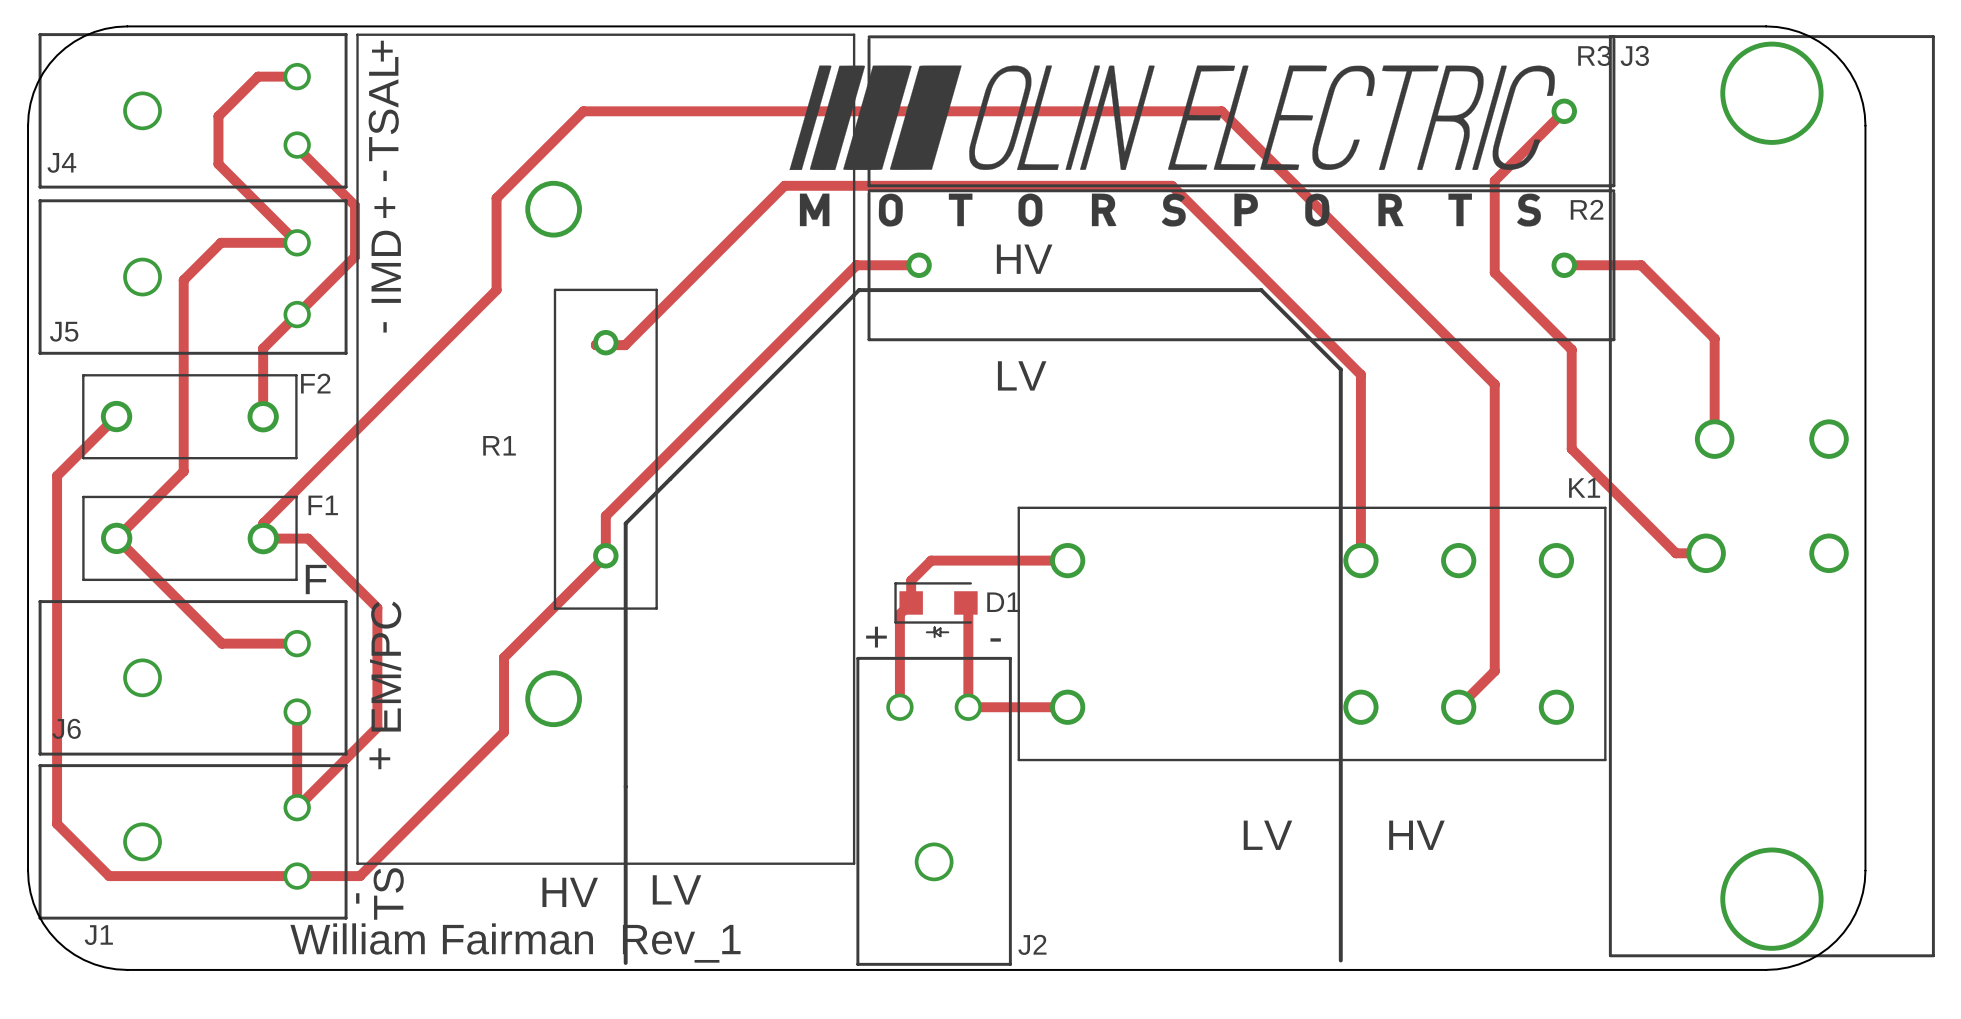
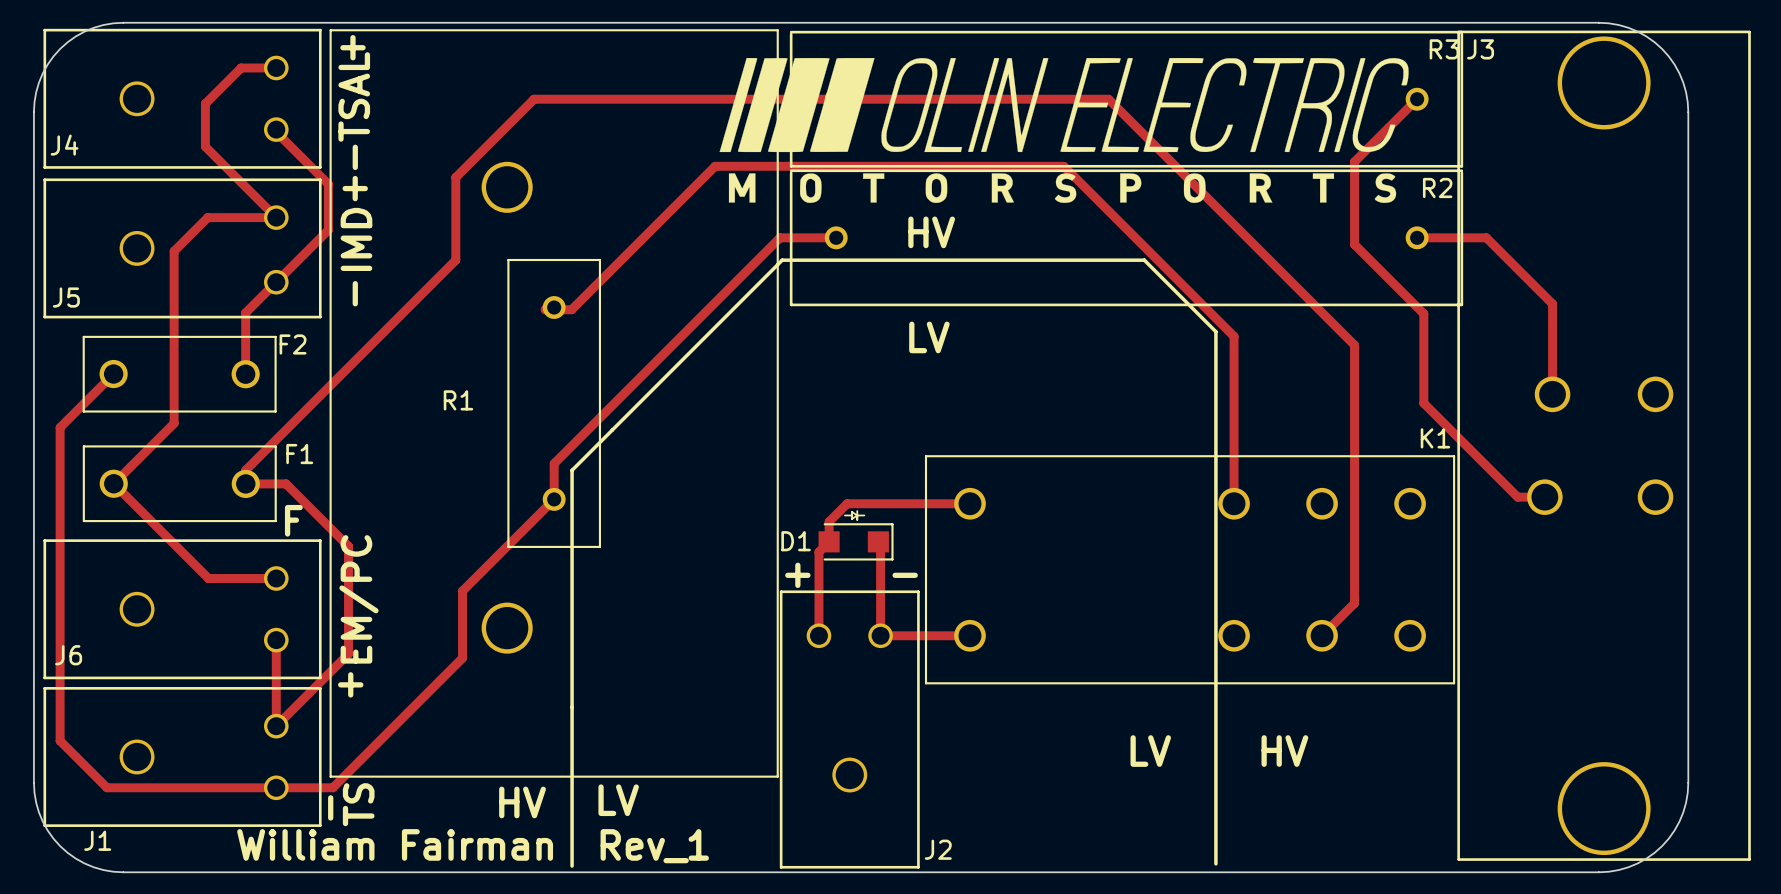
D1 rotation: 0° (936, 610) -> 180° (856, 535)

